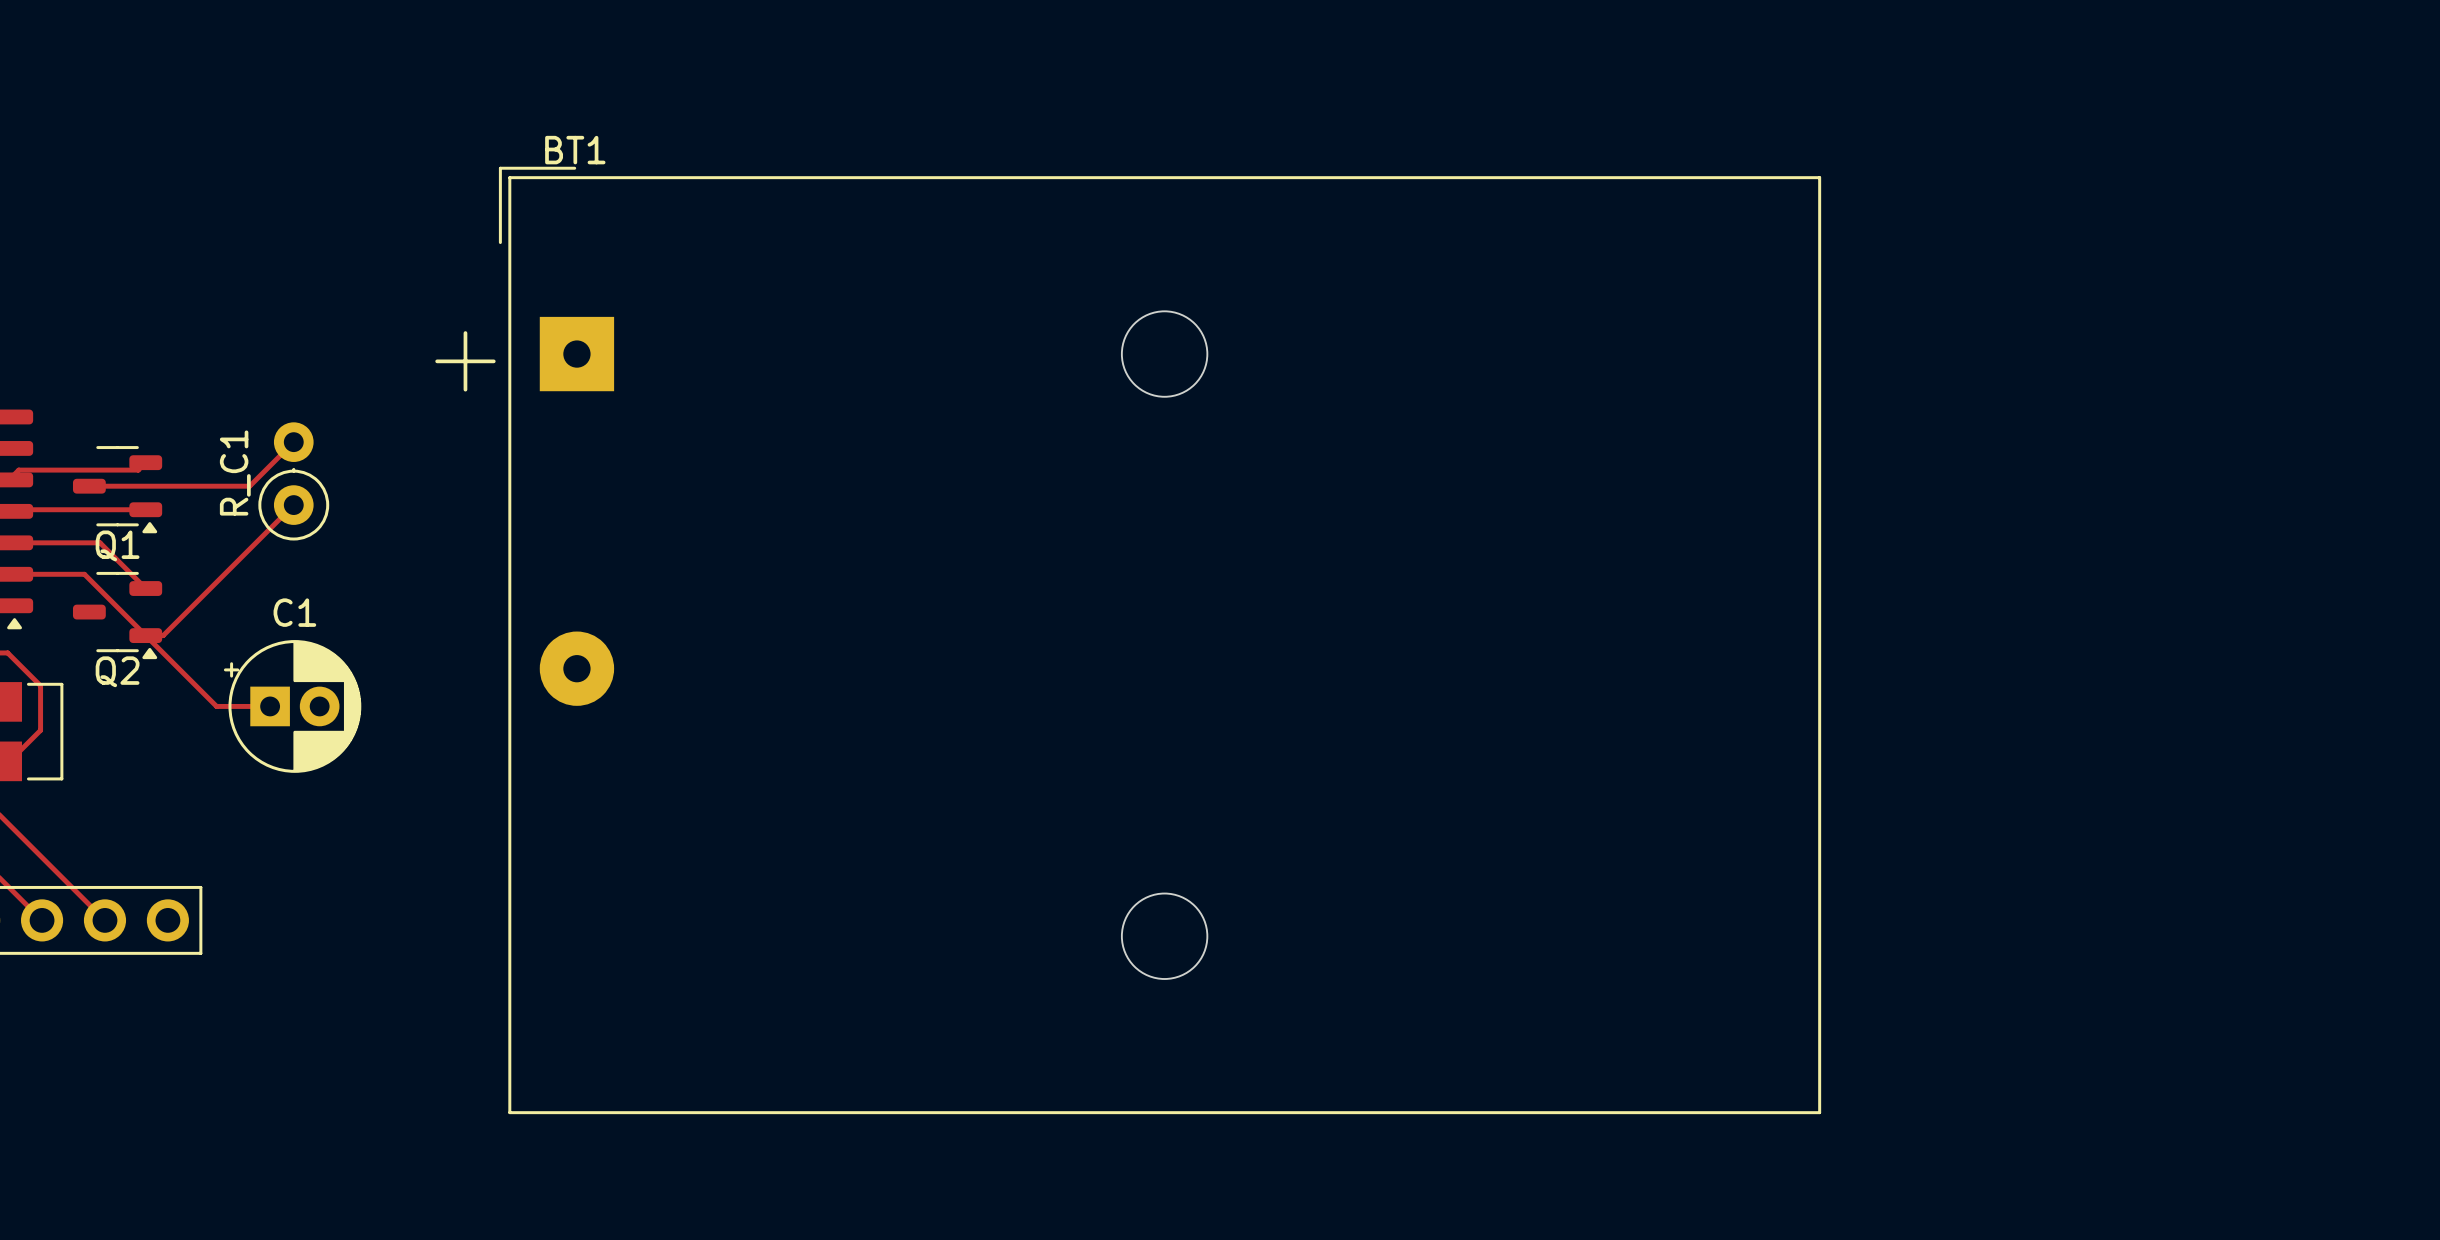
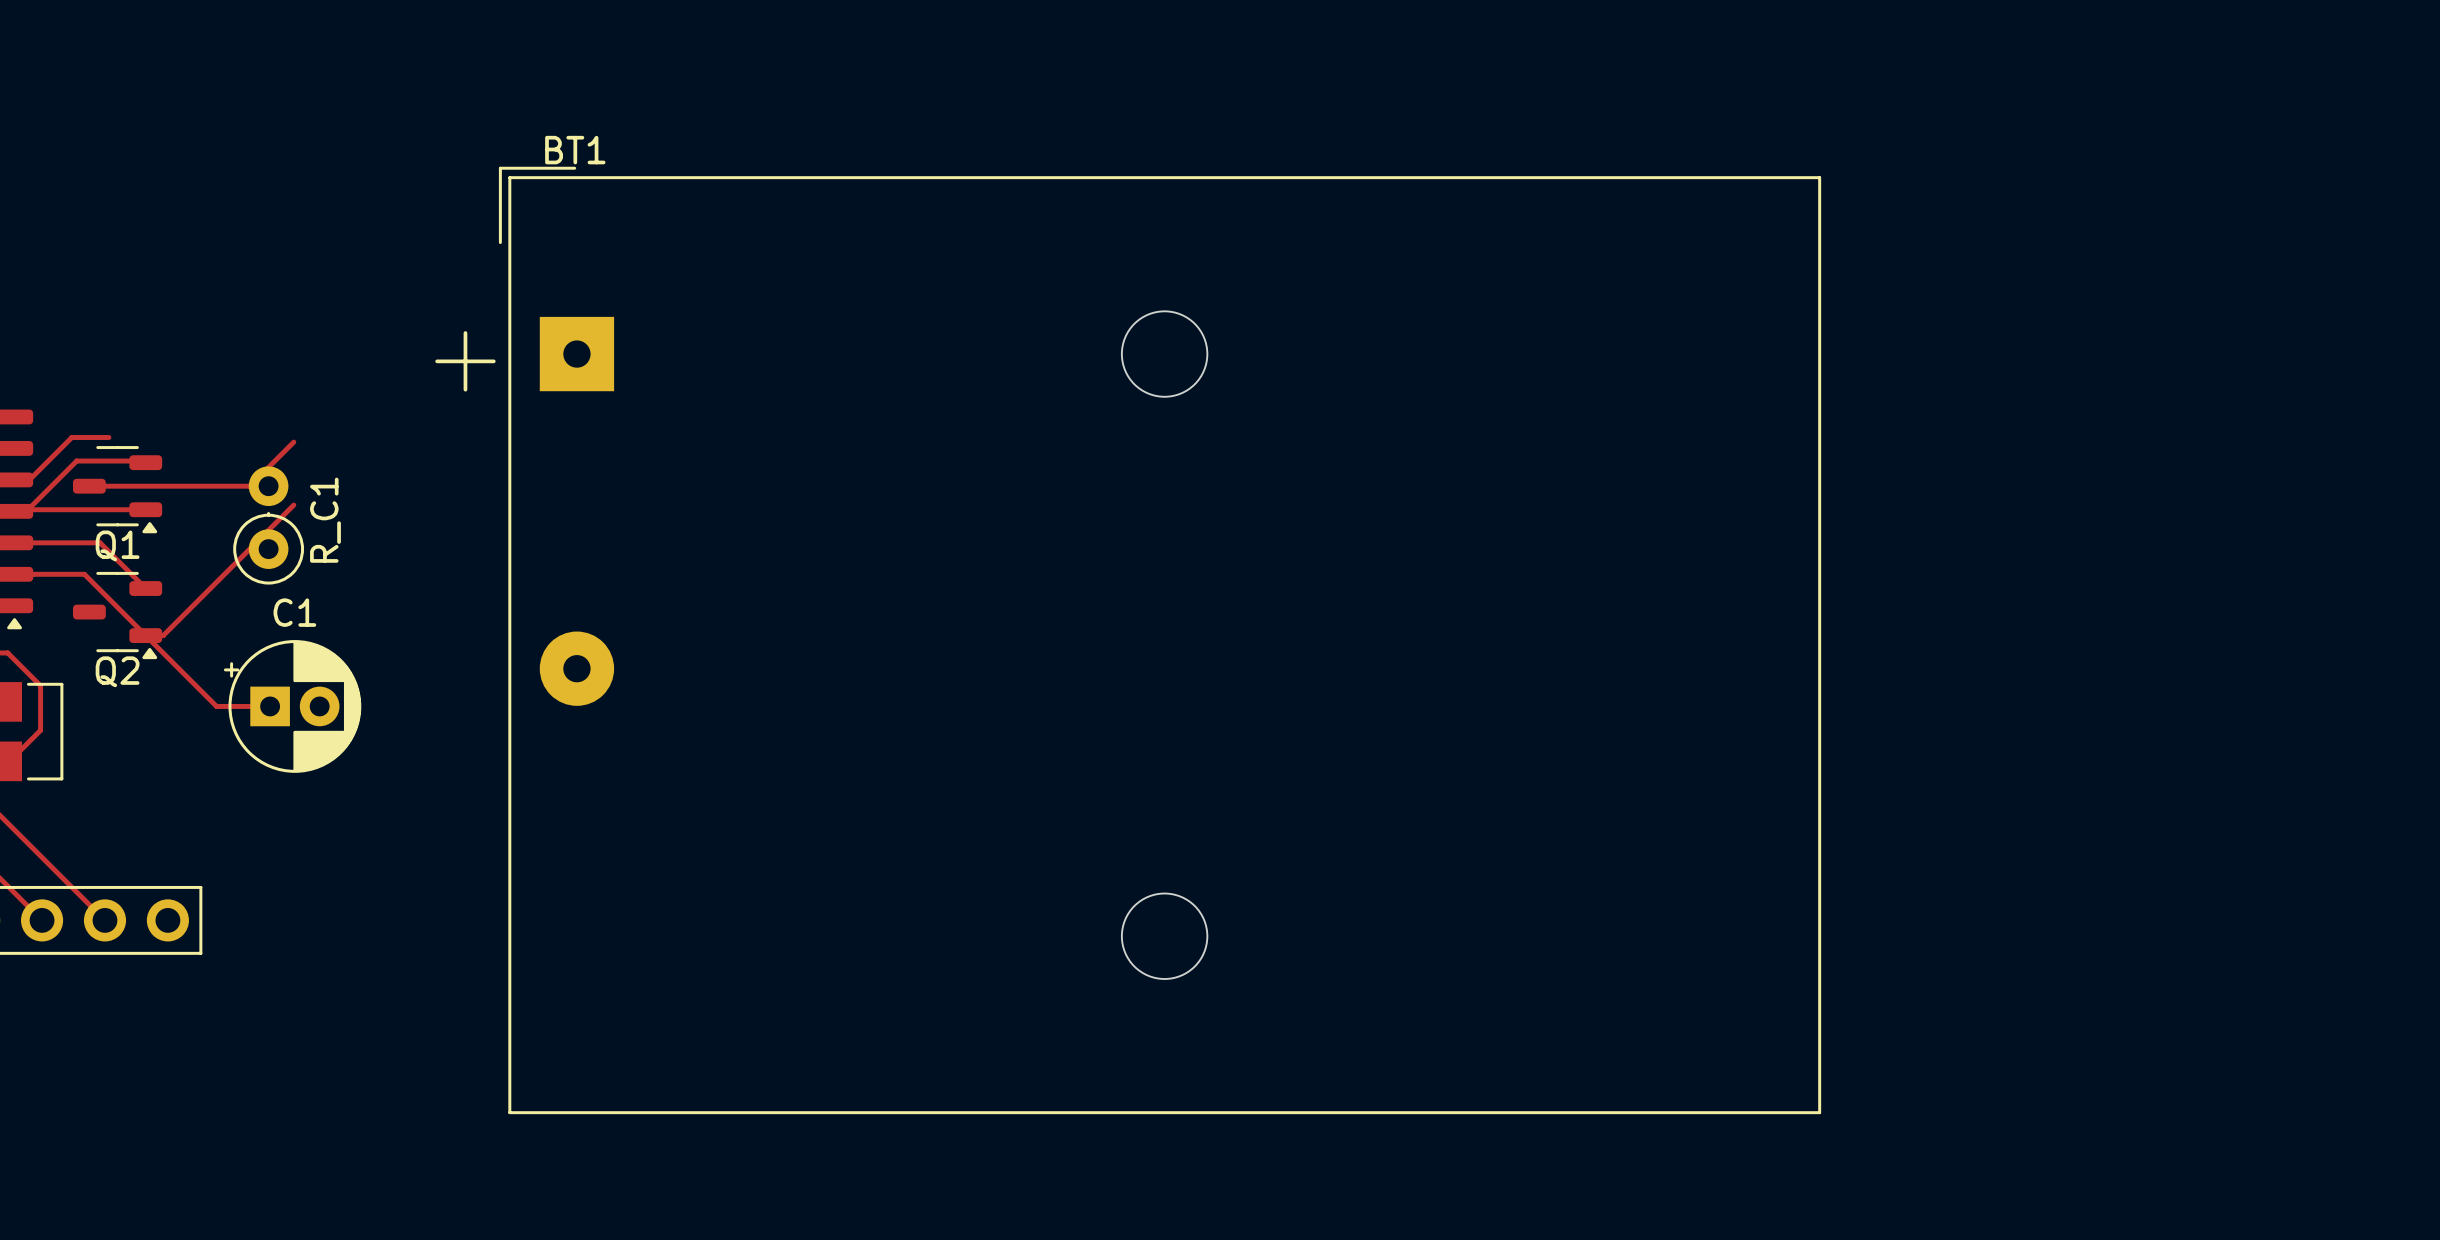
track: none -> (155, 461) (76, 461) (26, 511) (8, 511)
track: (145, 462) (138, 470) (18, 470) (8, 479) -> (108, 437) (71, 437) (29, 479) (8, 479)
R_C1 name position: R_C1 (235, 473) -> R_C1 (325, 520)
R_C1 position: (293, 481) -> (268, 525)

